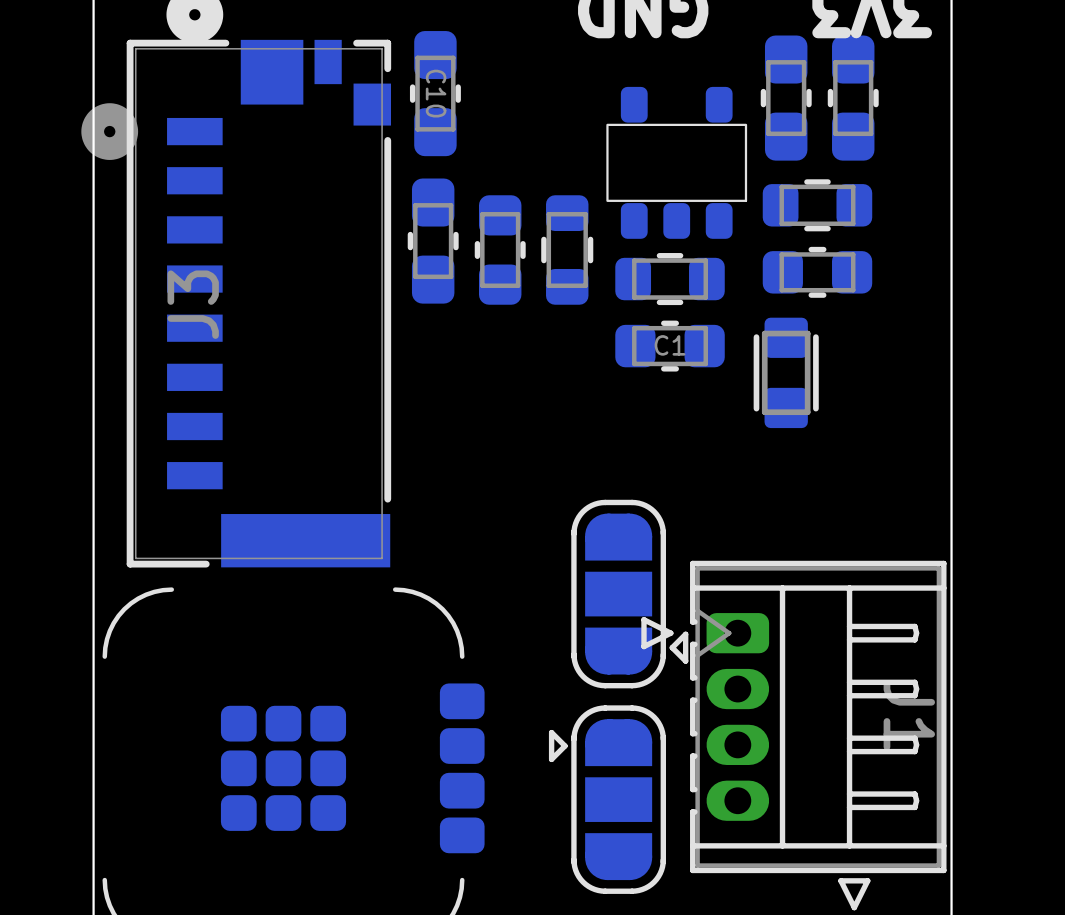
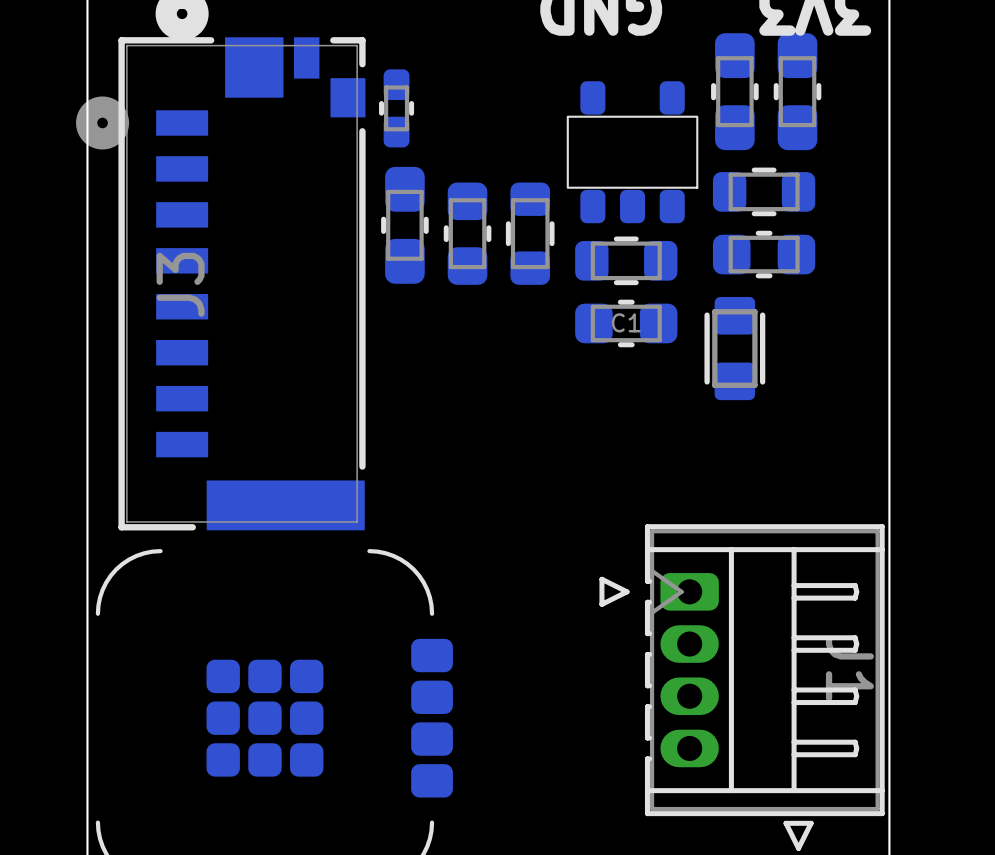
C10: (435, 93) -> none
part: none -> (396, 108)
part: (629, 594) -> none
part: (607, 799) -> none

